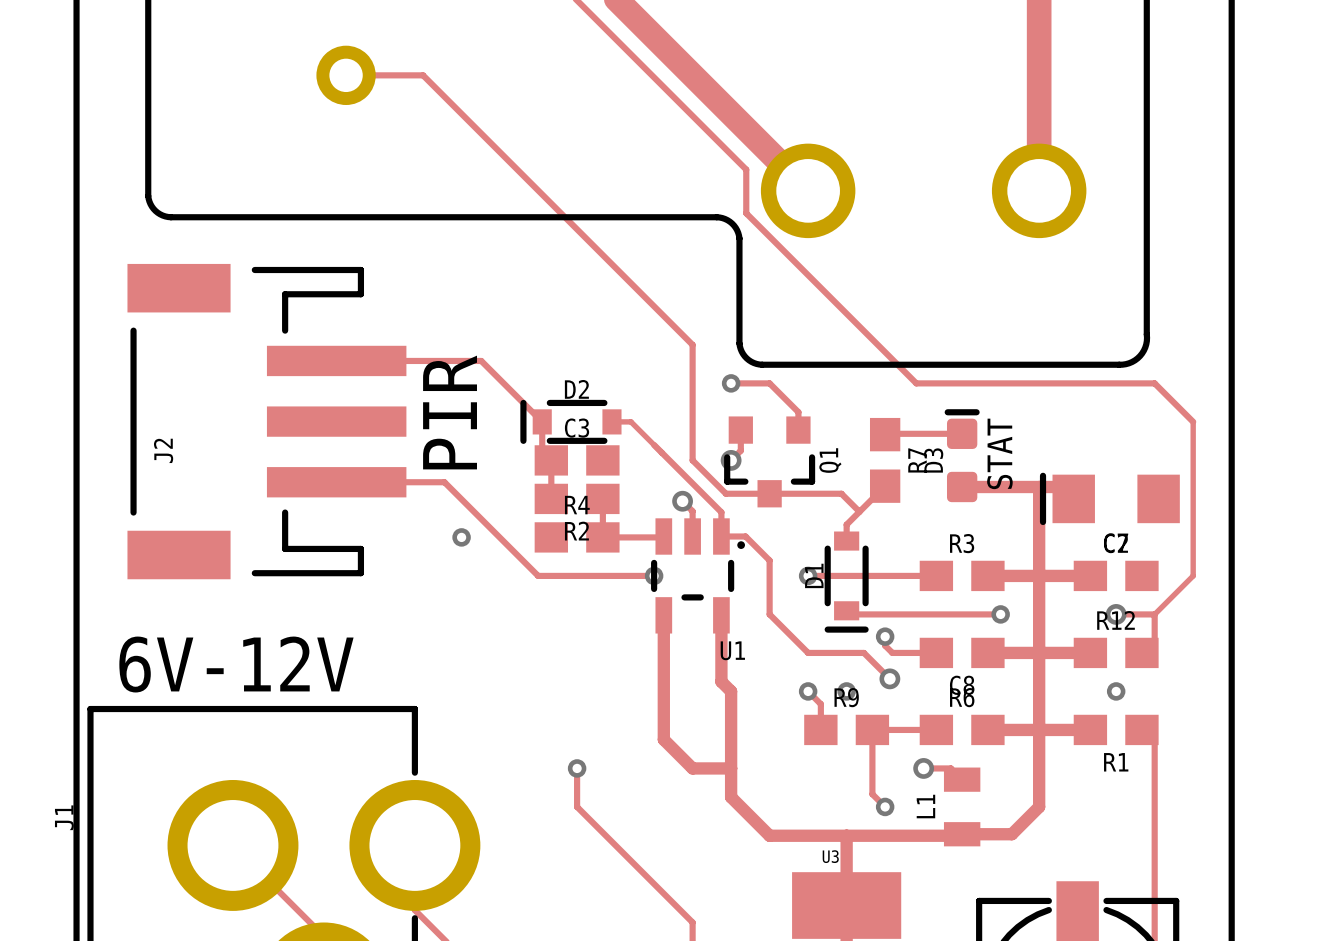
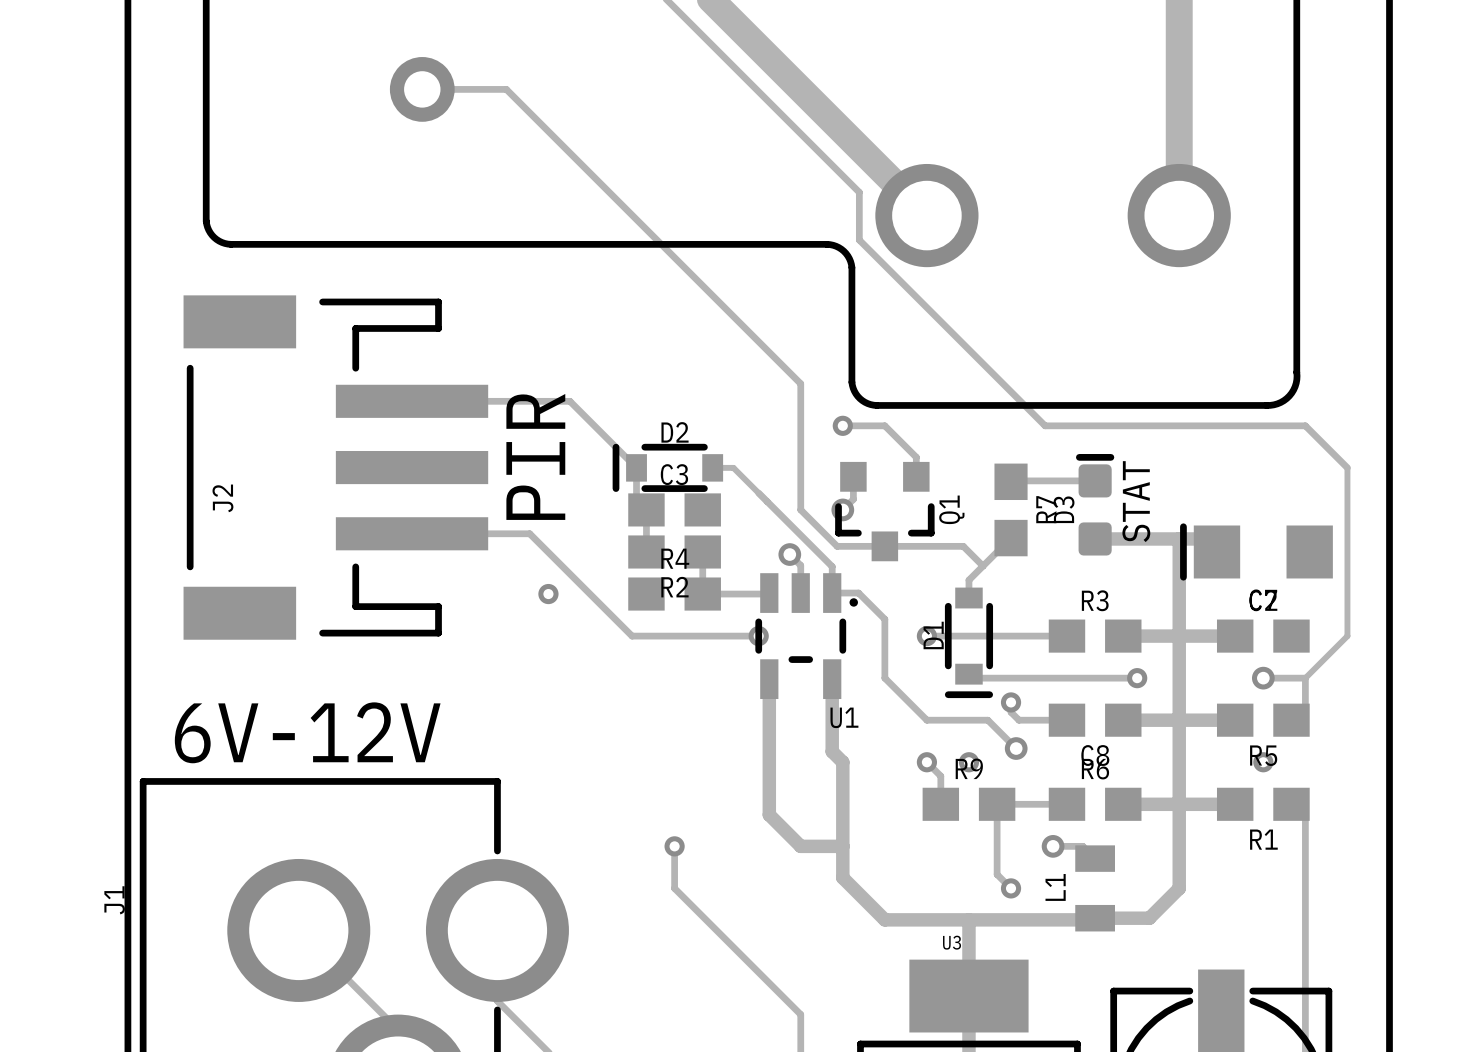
R12 name: R12 (1116, 620) -> R5 (1263, 755)

